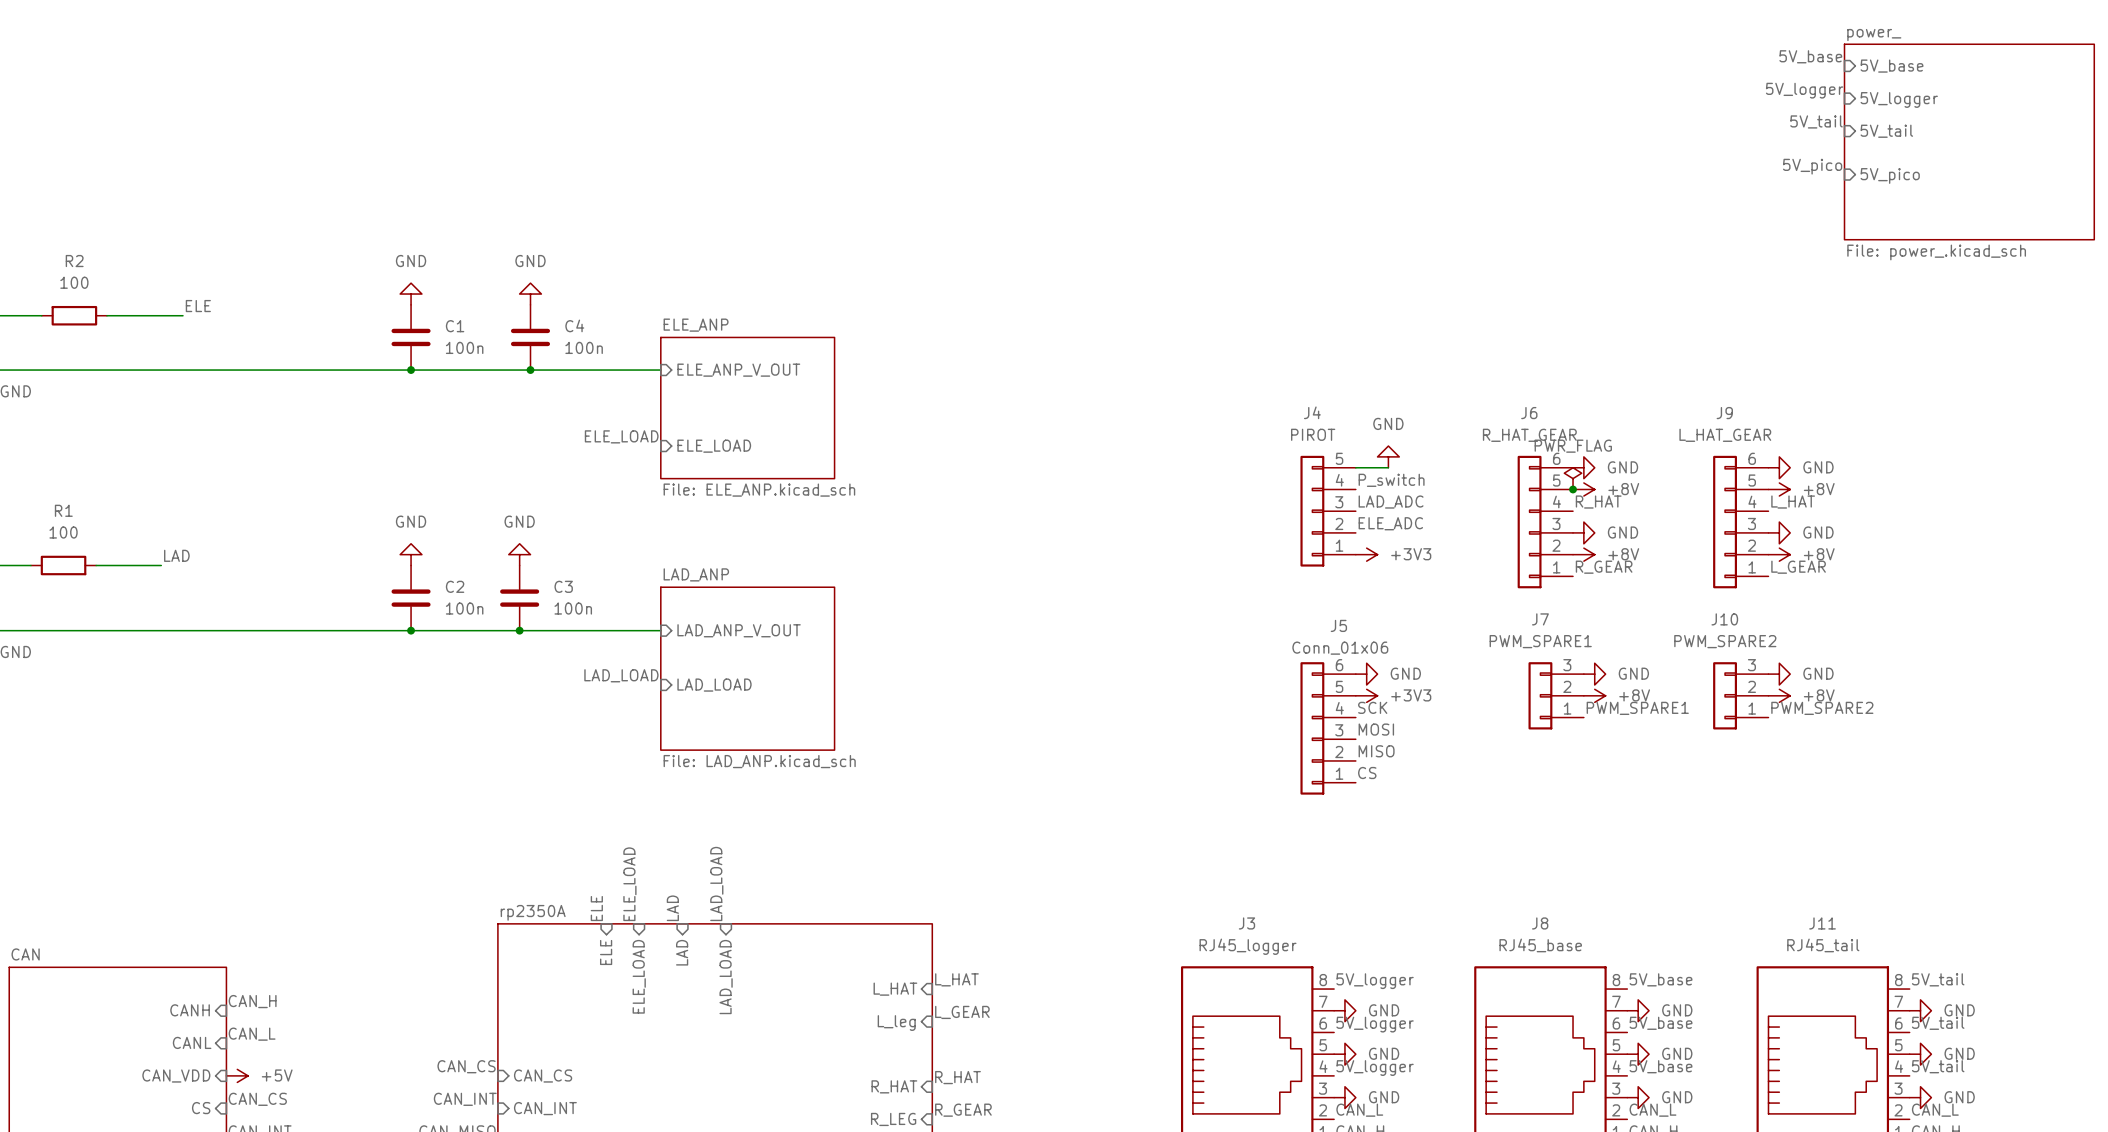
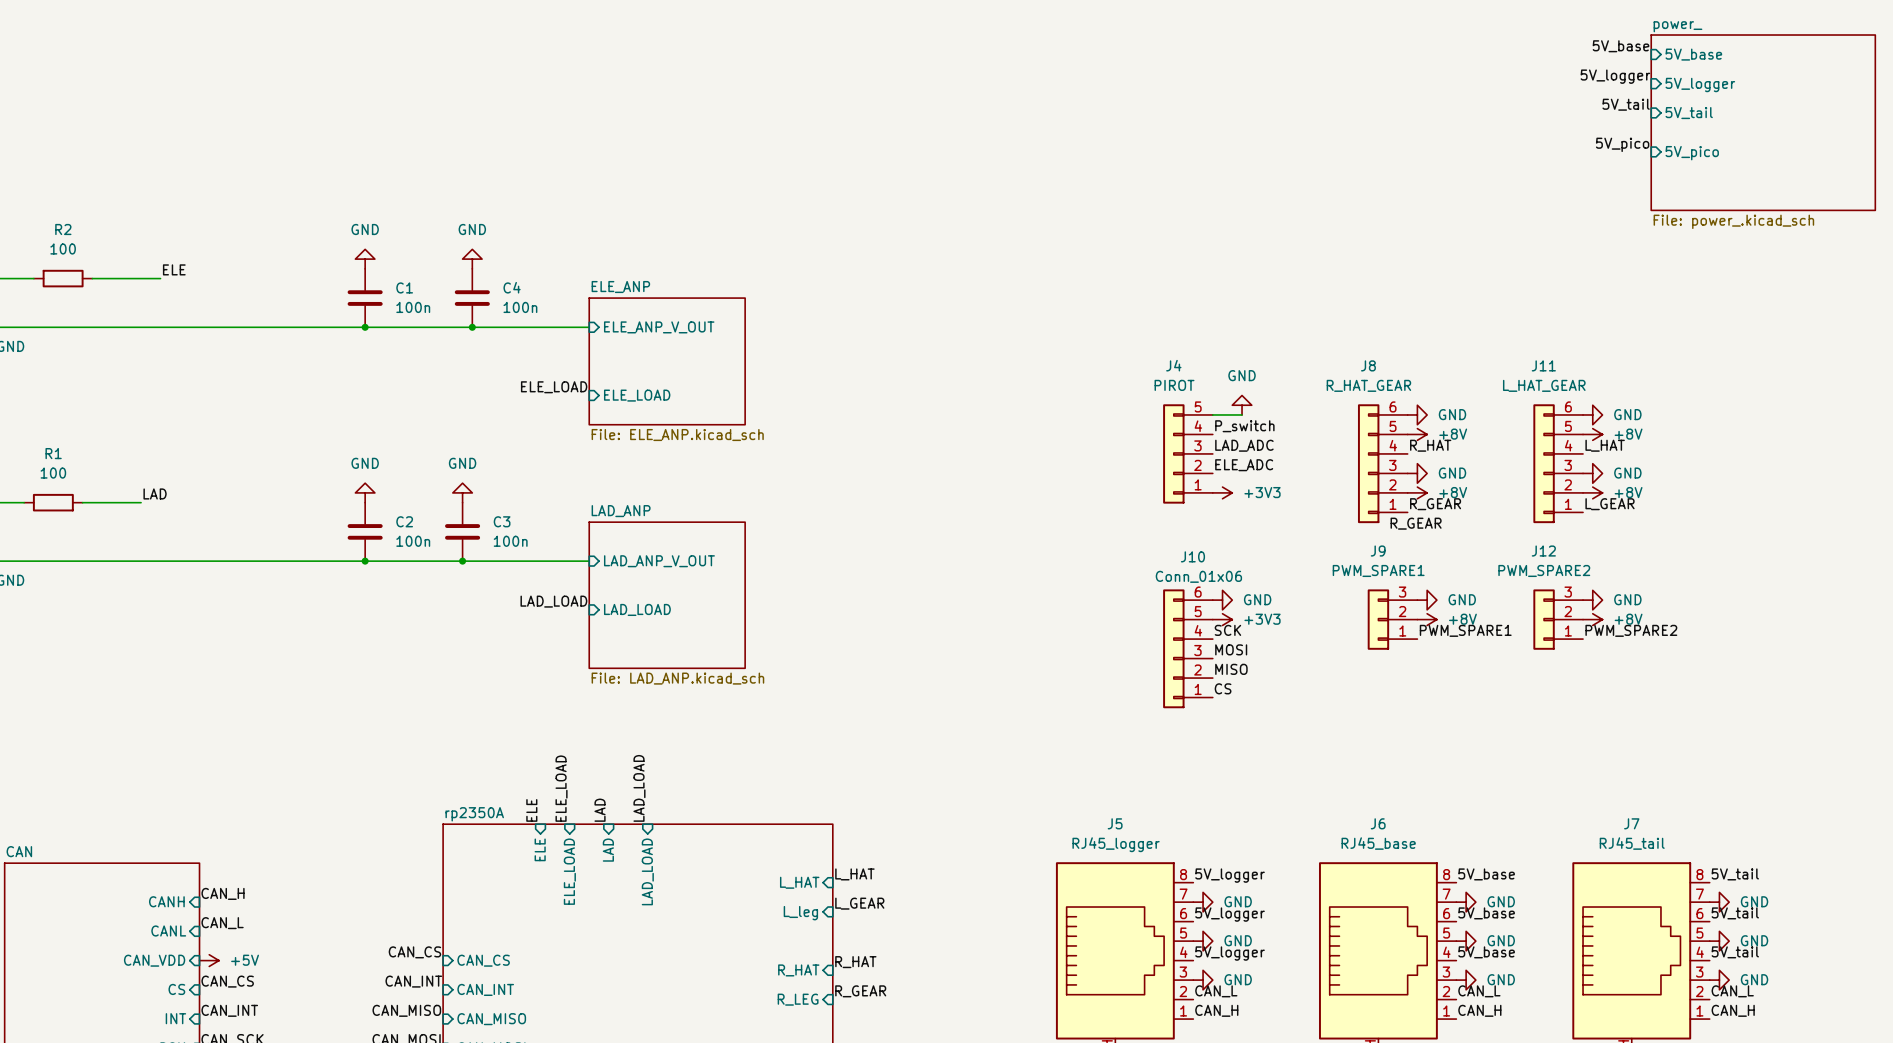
J6 name: J6 (1529, 413) -> J8 (1368, 365)
J9 name: J9 (1724, 413) -> J11 (1543, 365)
power symbol: PWR_FLAG (1573, 478) -> none
junction: (1573, 489) -> none
label: none -> R_GEAR (1416, 523)
J7 name: J7 (1540, 619) -> J9 (1378, 551)
J10 name: J10 (1724, 619) -> J12 (1543, 551)
J5 name: J5 (1338, 625) -> J10 (1192, 556)
J3 name: J3 (1246, 923) -> J5 (1115, 823)
J8 name: J8 (1540, 923) -> J6 (1378, 823)
J11 name: J11 (1822, 923) -> J7 (1631, 823)

